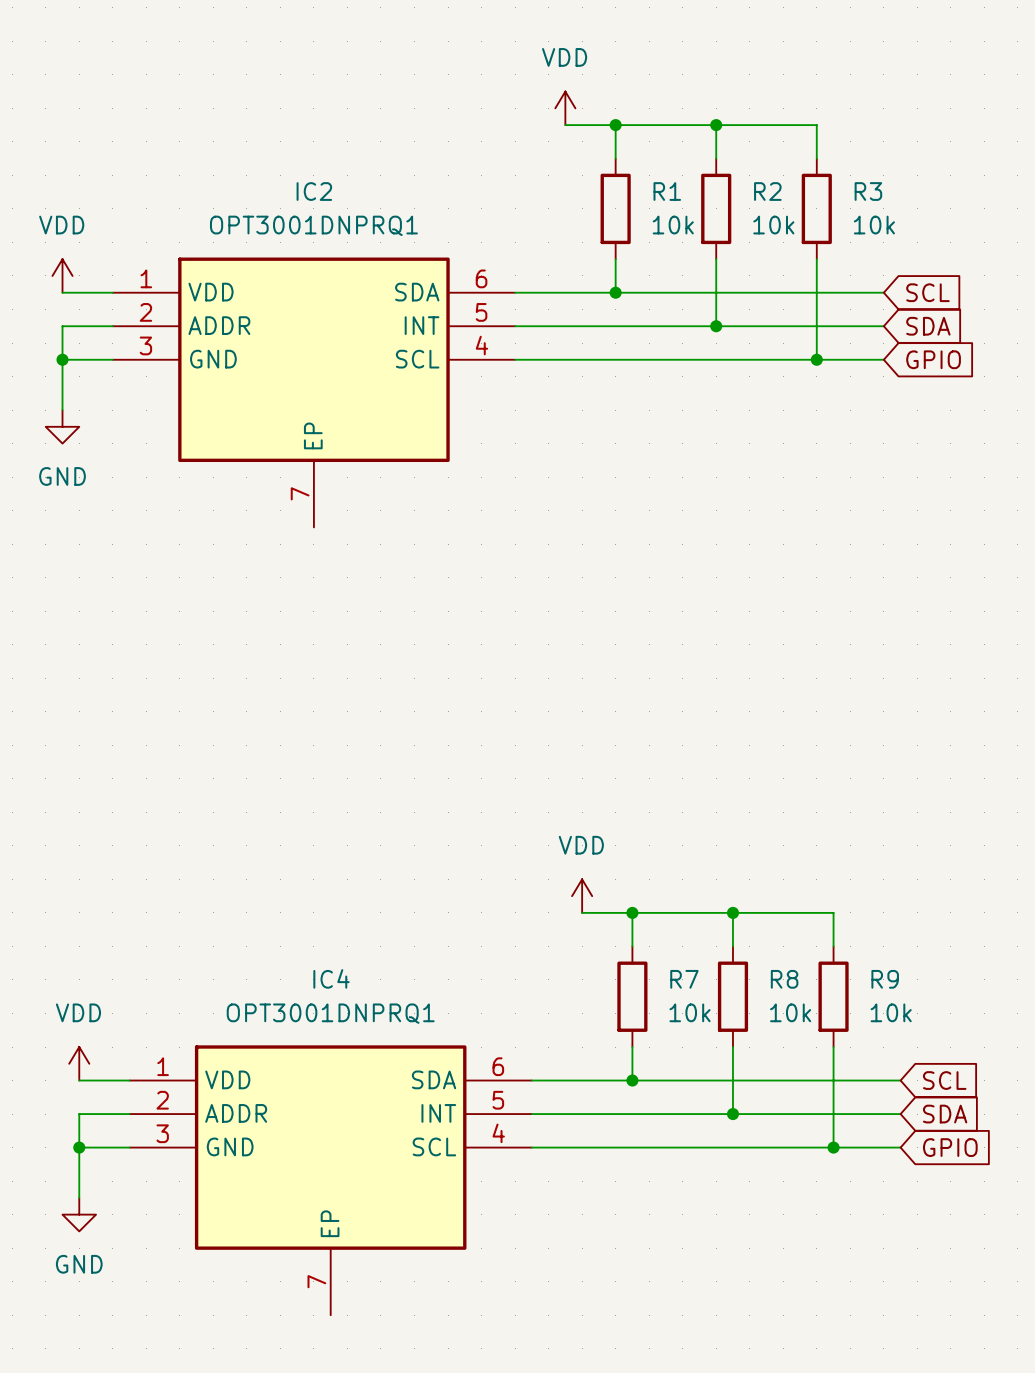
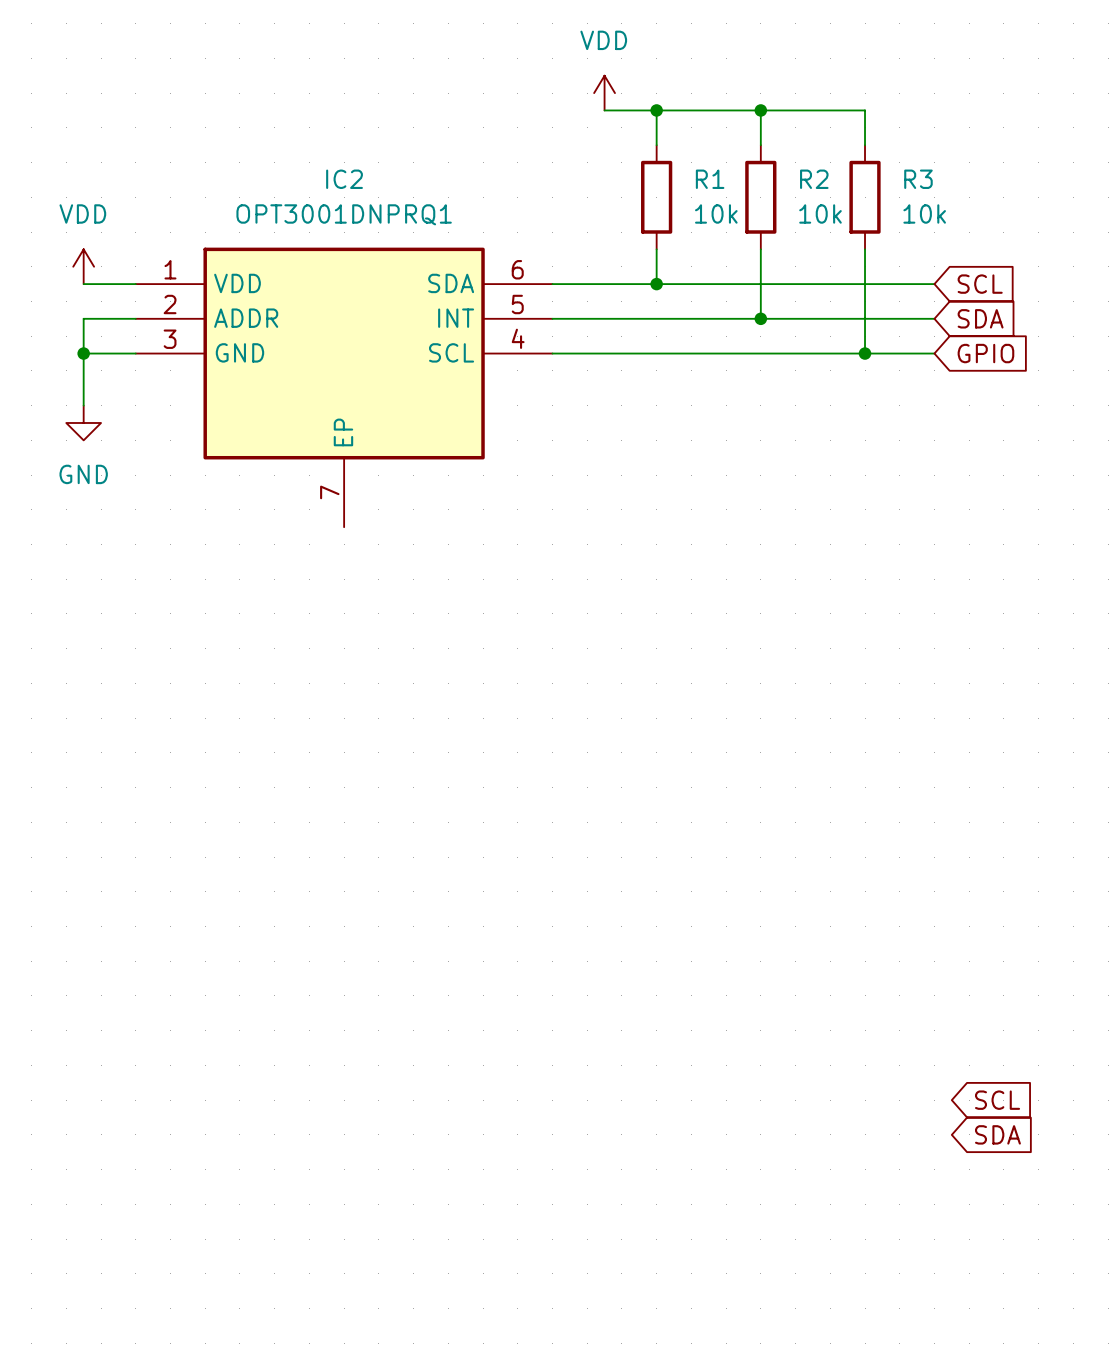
power symbol: VDD (582, 896) -> none
wire: (582, 912) (833, 912) (833, 946) -> none
wire: (632, 912) (632, 946) -> none
junction: (632, 912) -> none
wire: (732, 912) (732, 946) -> none
junction: (732, 912) -> none
R7: 10k (632, 996) -> none
R8: 10k (732, 996) -> none
R9: 10k (833, 996) -> none
wire: (632, 1047) (632, 1080) -> none
wire: (732, 1047) (732, 1114) -> none
wire: (833, 1047) (833, 1147) -> none
power symbol: VDD (79, 1063) -> none
wire: (79, 1080) (129, 1080) -> none
wire: (531, 1080) (900, 1080) -> none
junction: (632, 1080) -> none
wire: (129, 1114) (79, 1114) (79, 1197) -> none
wire: (531, 1114) (900, 1114) -> none
junction: (732, 1114) -> none
wire: (79, 1147) (129, 1147) -> none
junction: (79, 1147) -> none
wire: (531, 1147) (900, 1147) -> none
junction: (833, 1147) -> none
global label: GPIO (950, 1147) -> none
IC4: OPT3001DNPRQ1 (330, 1180) -> none
power symbol: GND (79, 1214) -> none

